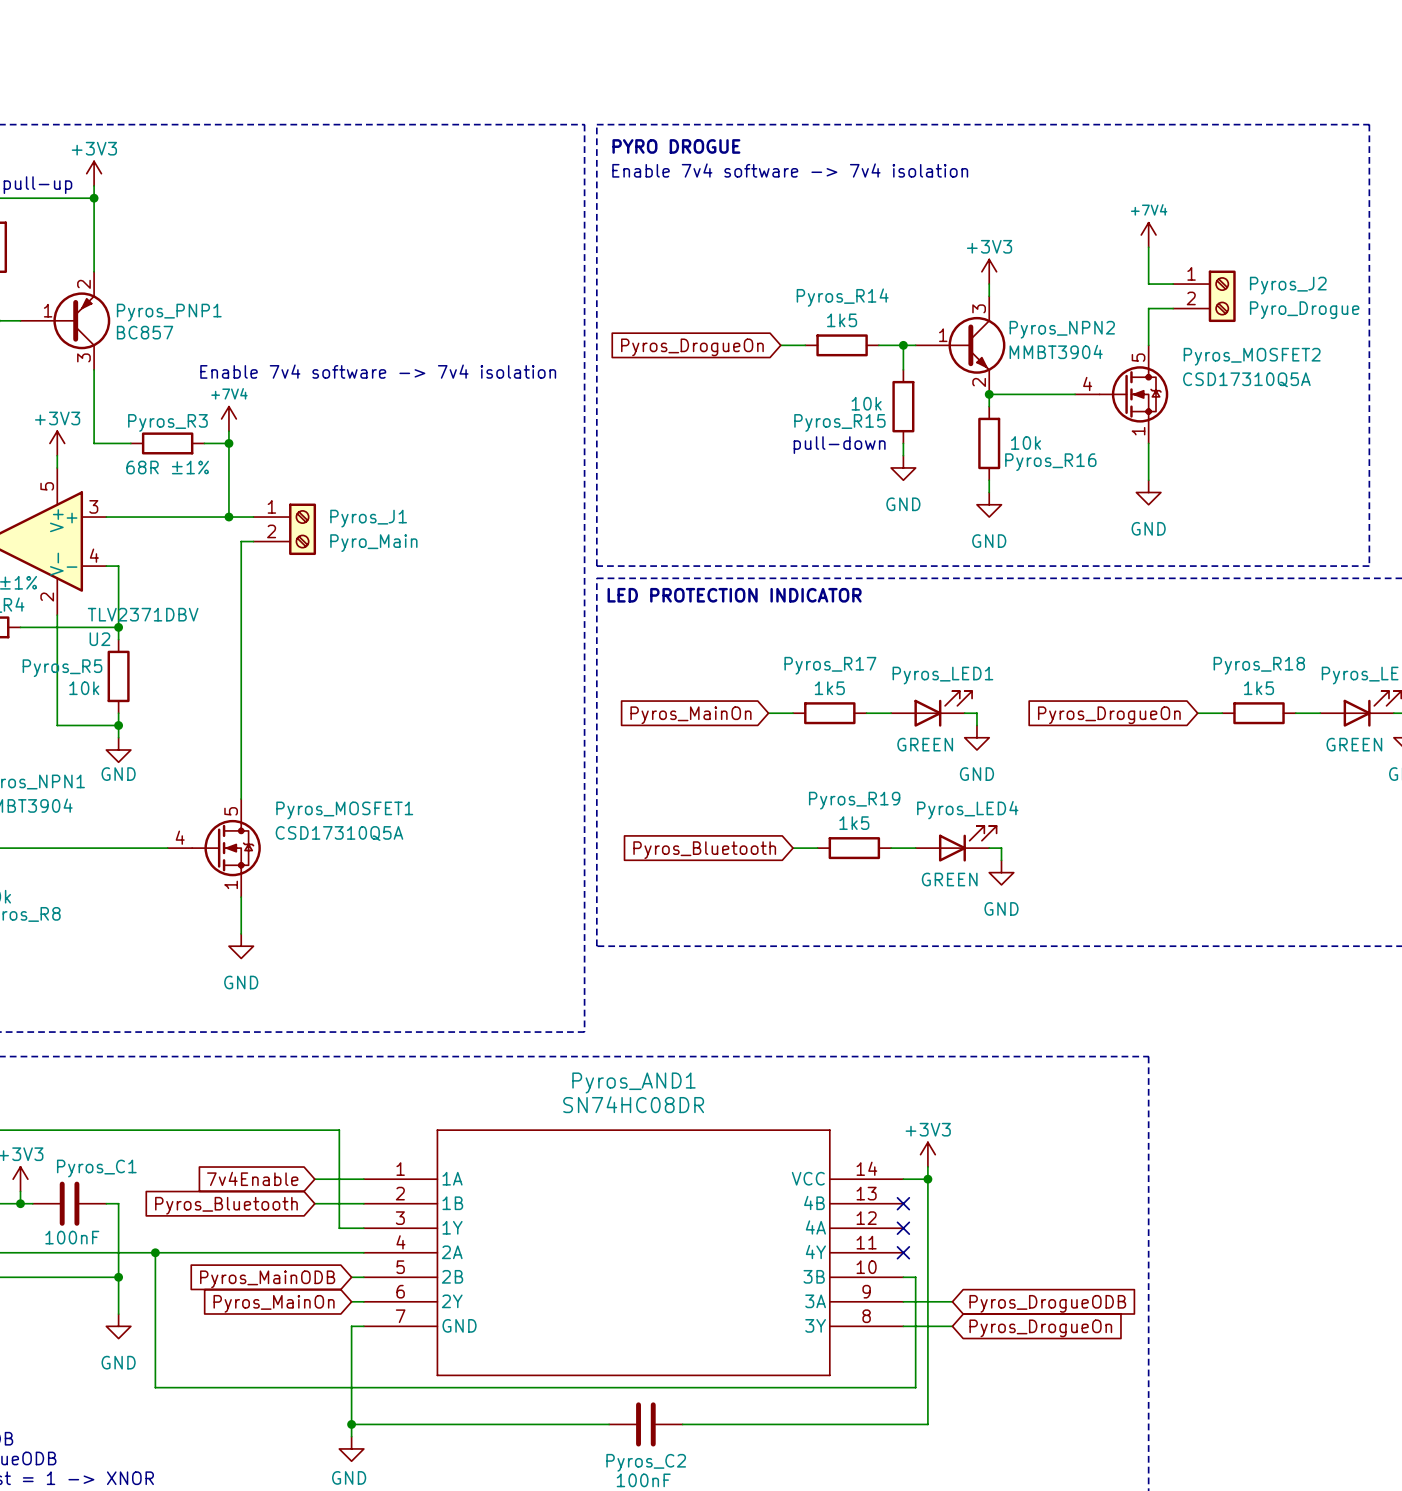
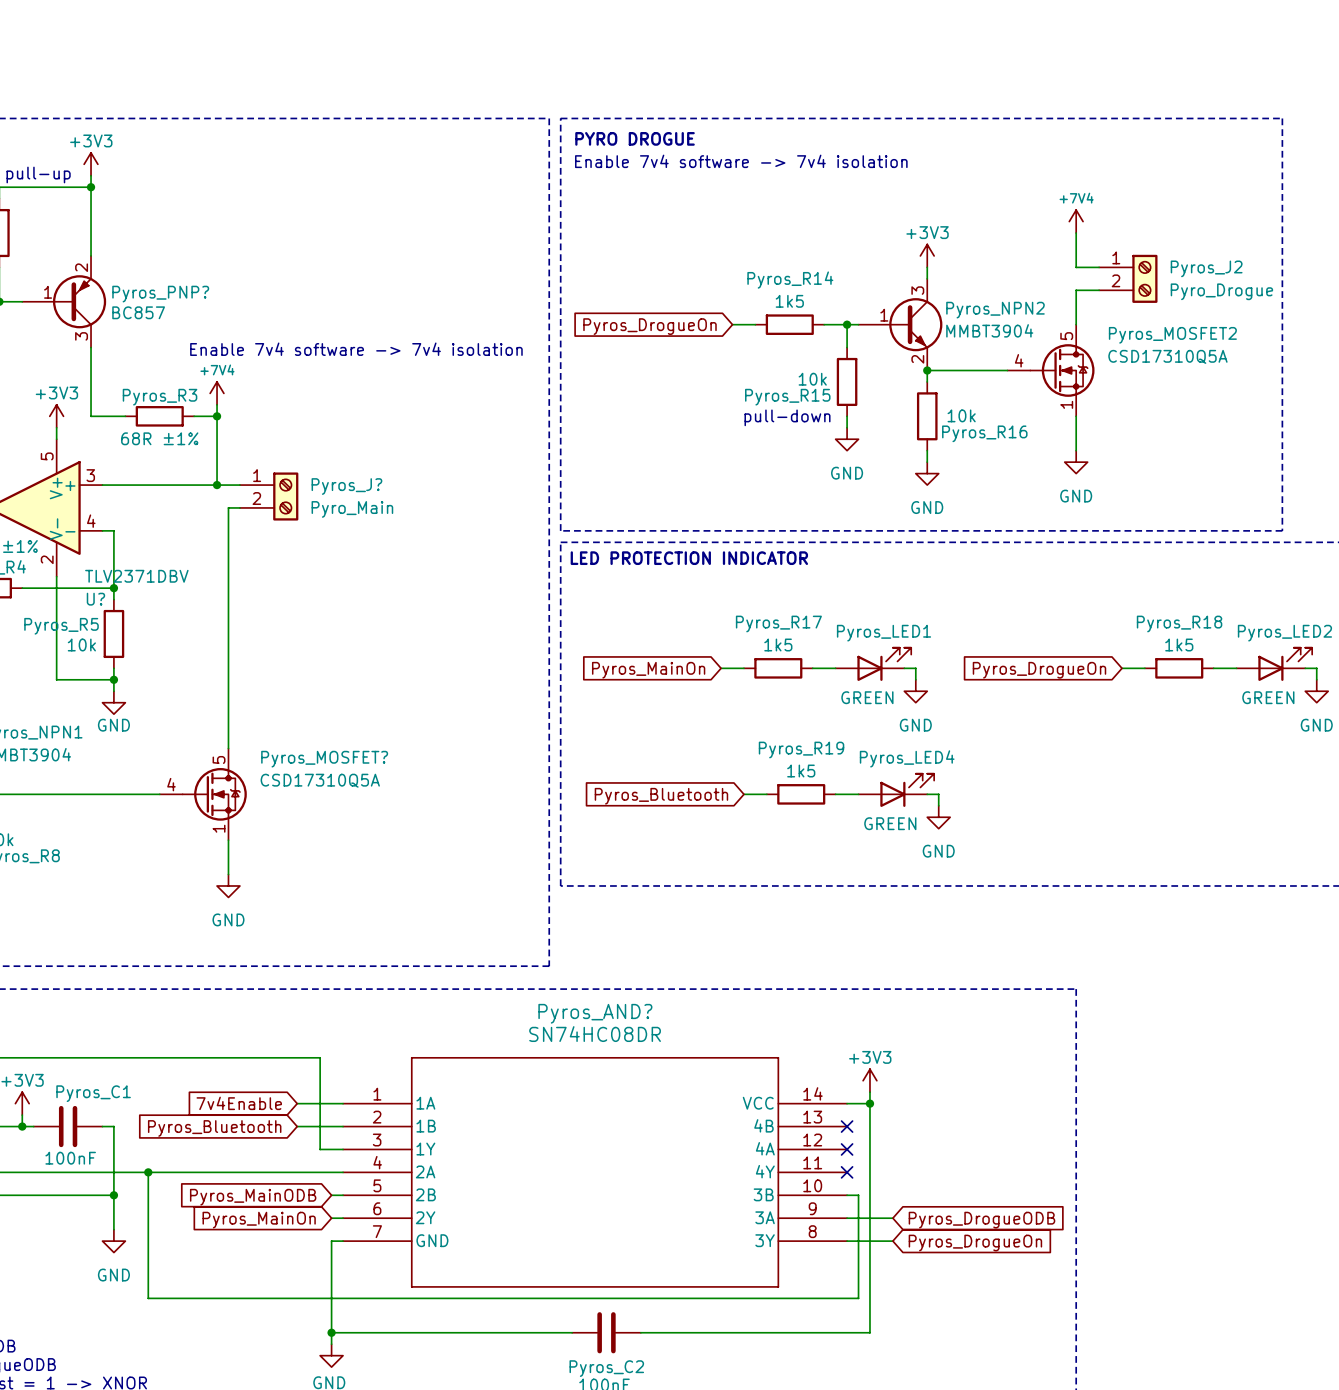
Pyros_PNP1 name: Pyros_PNP1 (169, 312) -> Pyros_PNP? (160, 294)
Pyros_J1 name: Pyros_J1 (368, 518) -> Pyros_J? (346, 486)
U2 name: U2 (99, 639) -> U? (95, 599)
Pyros_MOSFET1 name: Pyros_MOSFET1 (344, 810) -> Pyros_MOSFET? (324, 759)
Pyros_AND1 name: Pyros_AND1 (633, 1082) -> Pyros_AND? (595, 1013)

